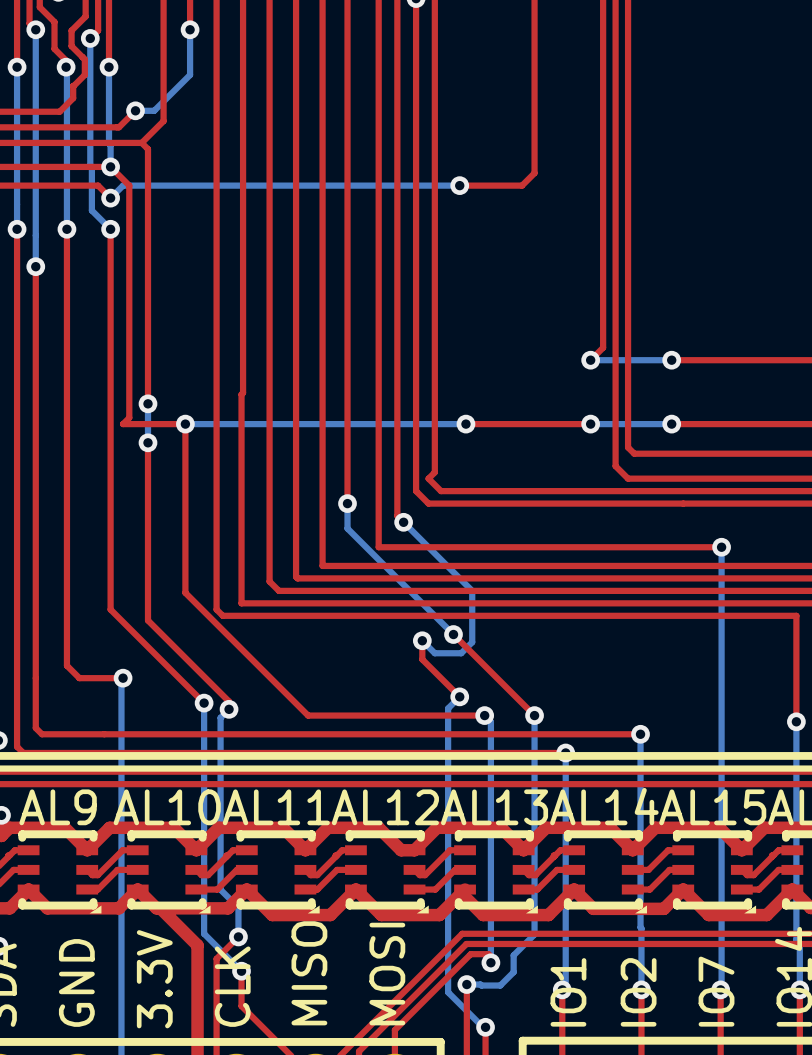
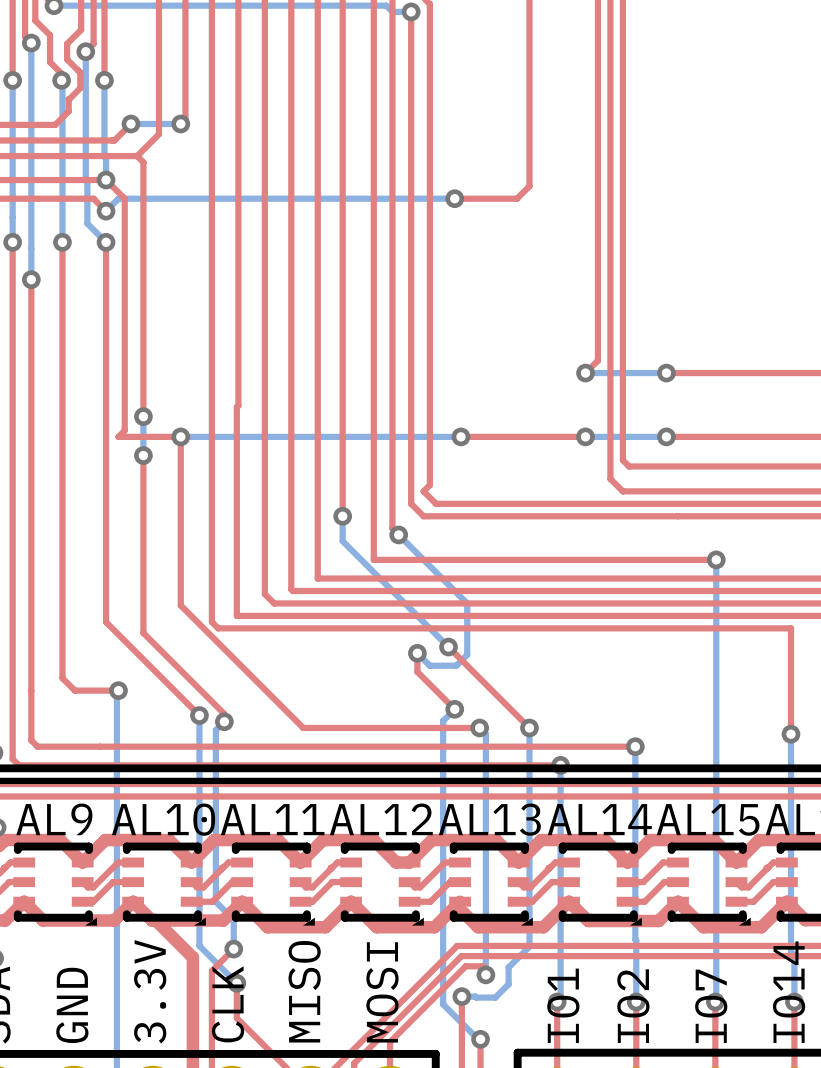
top track: none -> (185, 43) (185, 119) (180, 123)
bottom track: (190, 29) (190, 74) (154, 110) -> (180, 123) (149, 123)
via position: (190, 29) -> (180, 123)

